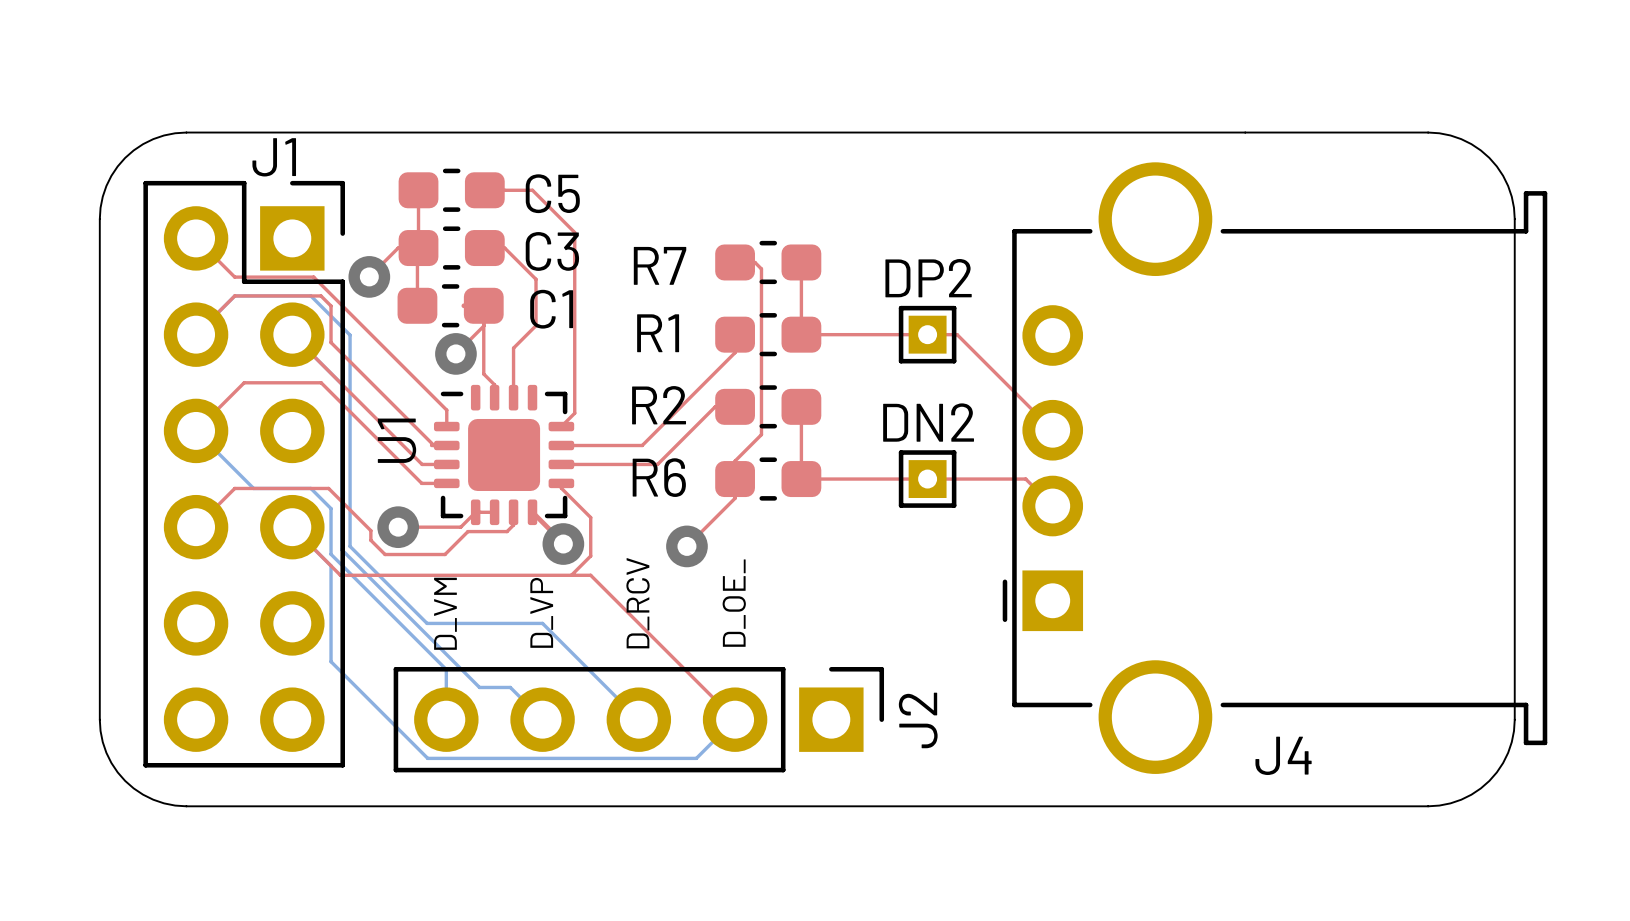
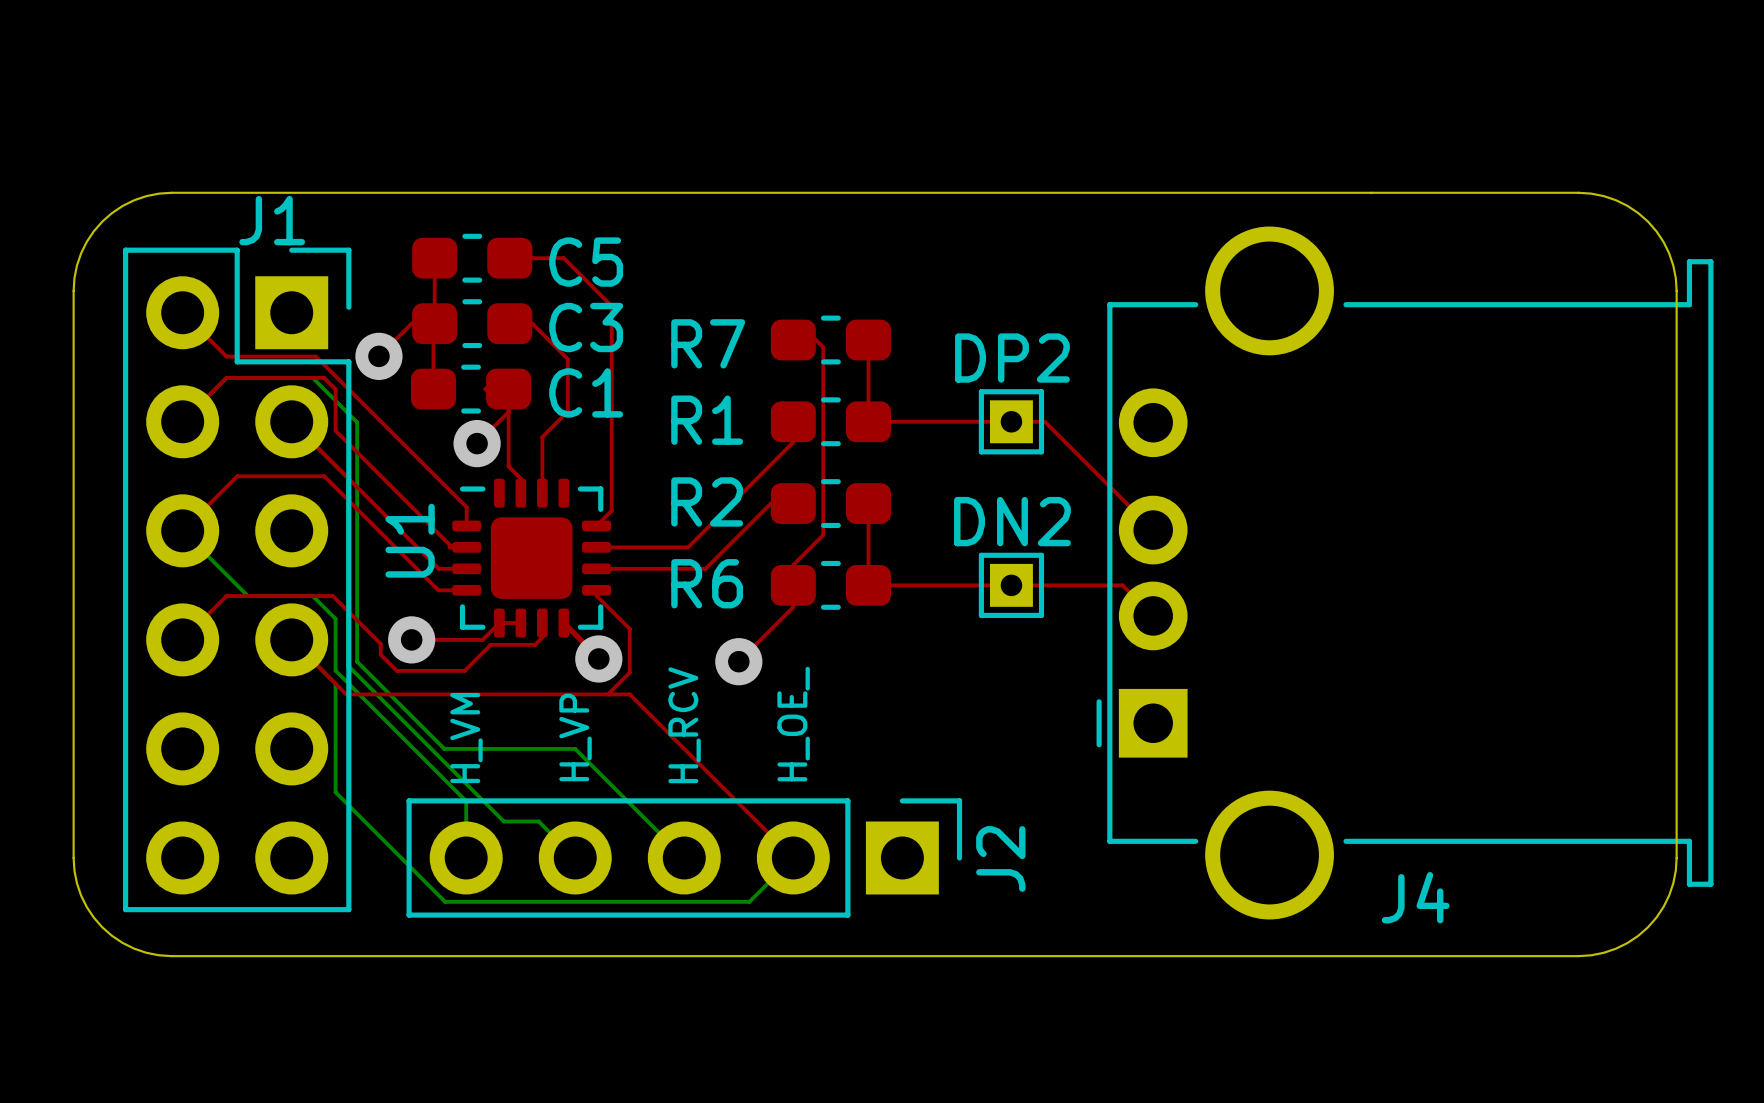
text: D_RCV (638, 603) -> H_RCV (684, 725)
text: D_OE_ (734, 603) -> H_OE_ (793, 724)
text: D_VP (541, 612) -> H_VP (575, 737)
text: D_VM (445, 613) -> H_VM (466, 738)

